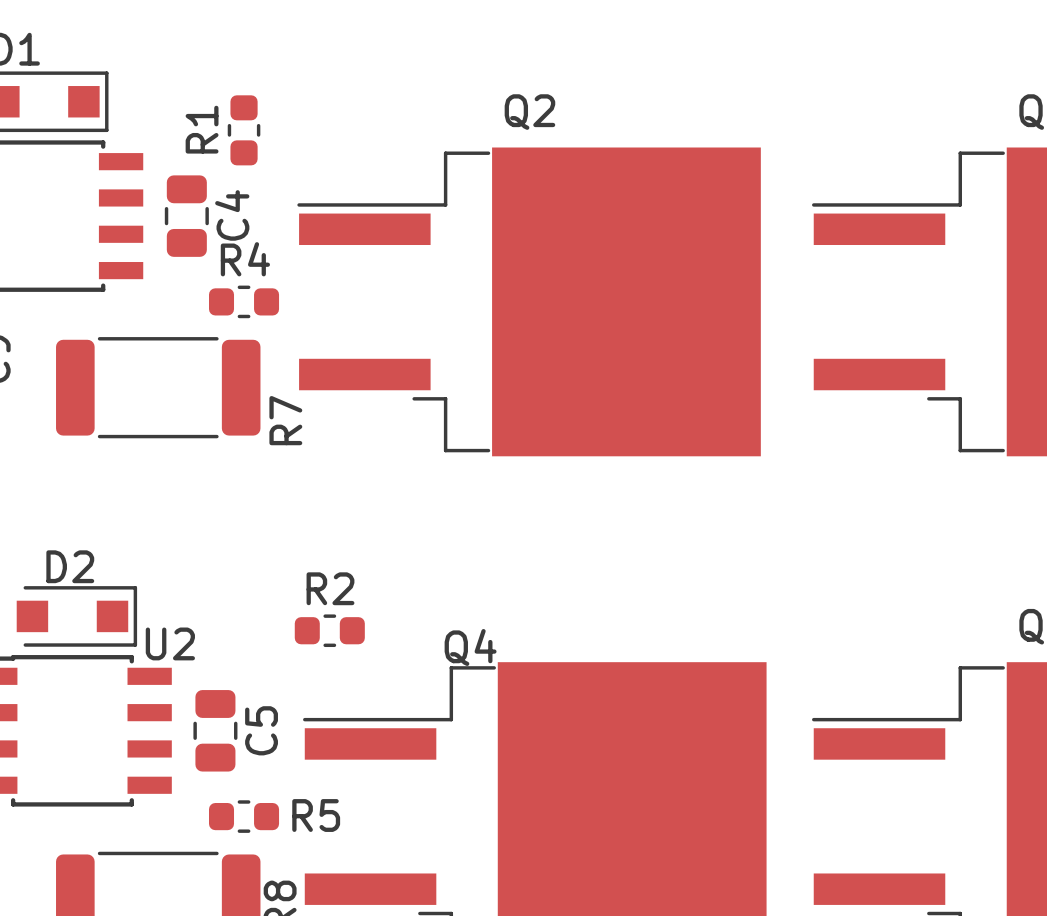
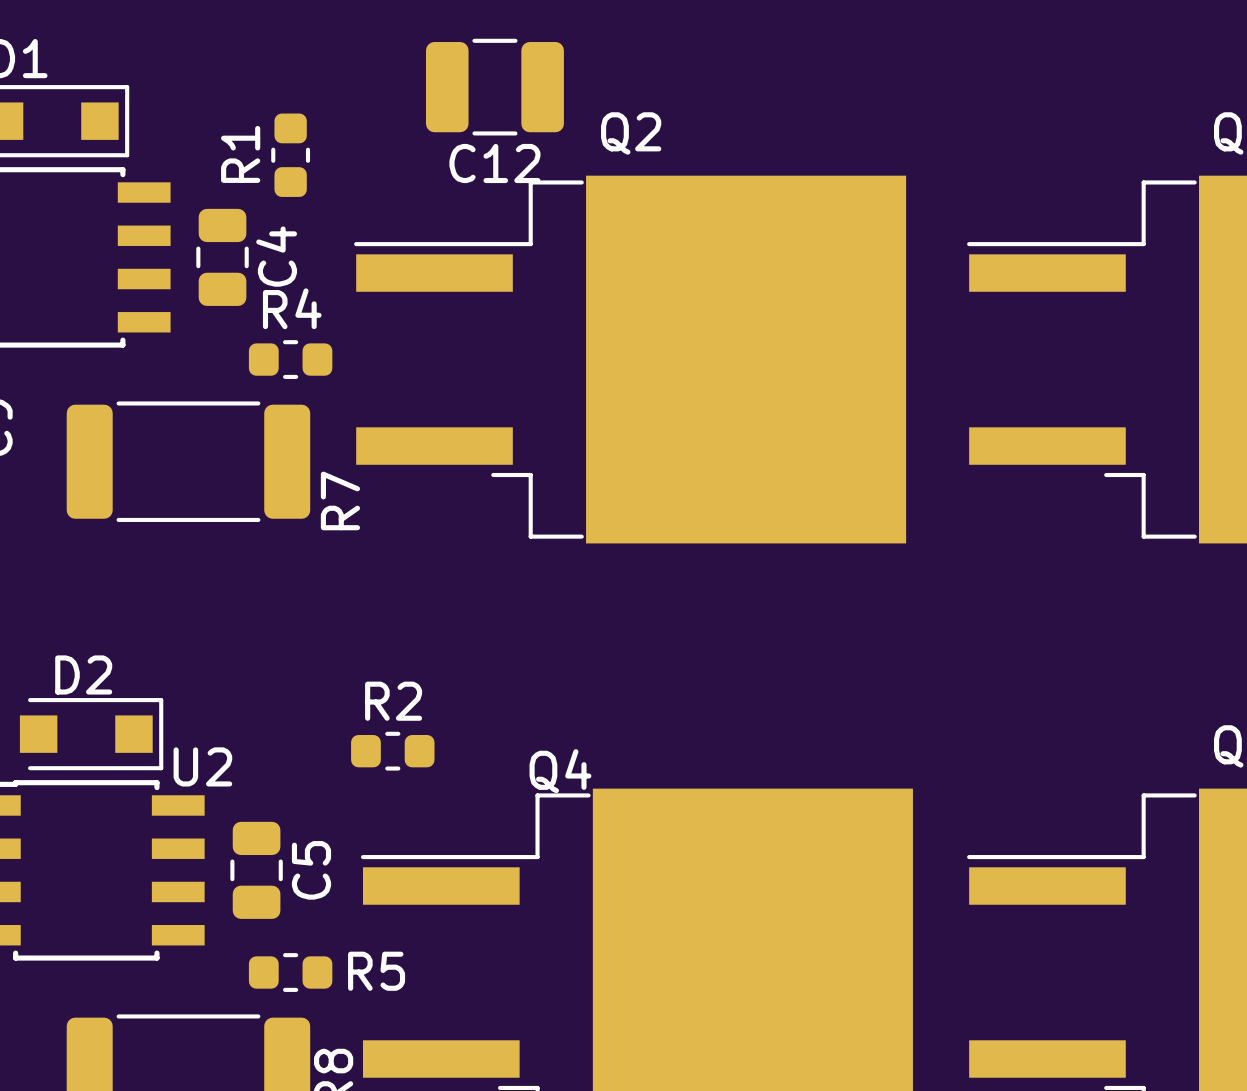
C12: none -> (494, 87)

